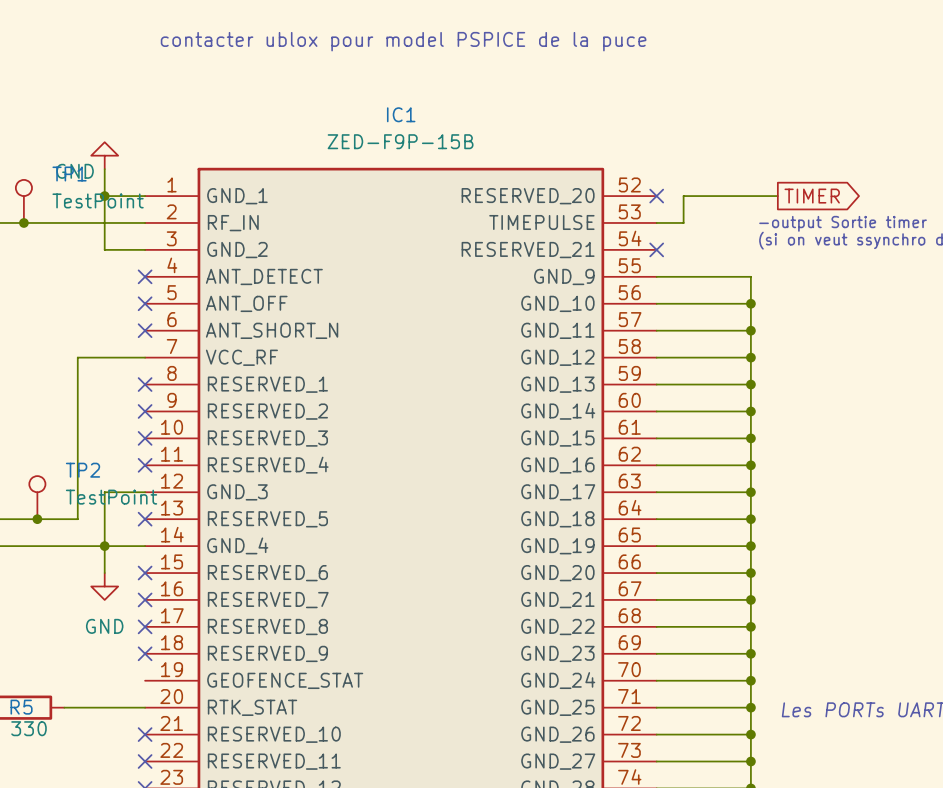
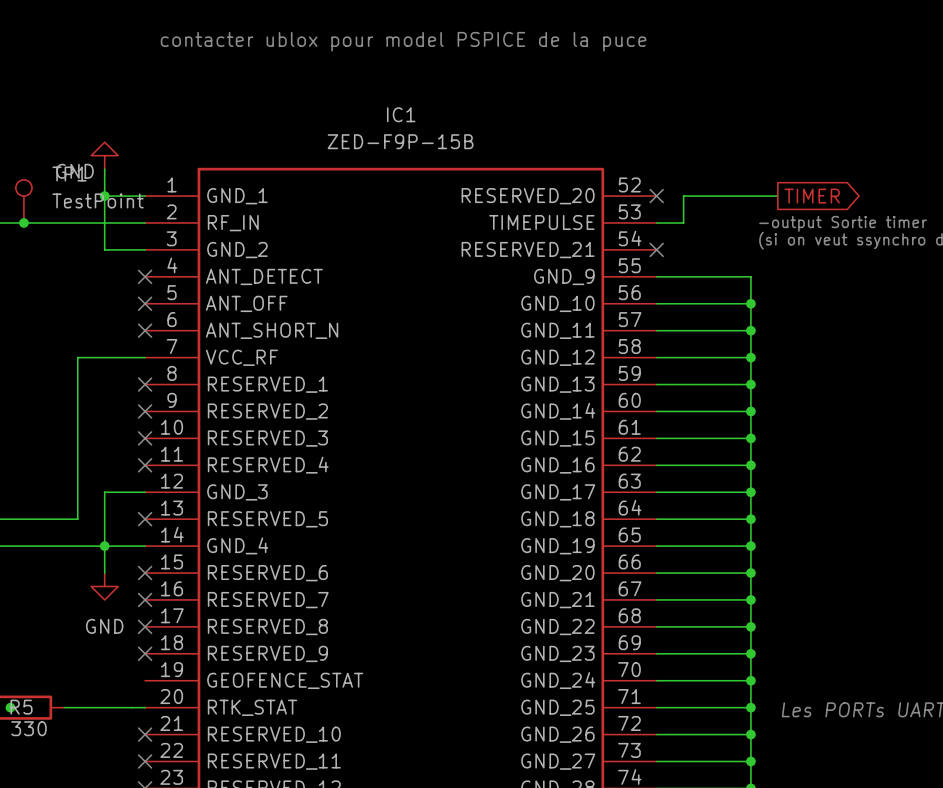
TP2: TestPoint (37, 497) -> none
junction: (37, 519) -> none
junction: none -> (10, 707)

